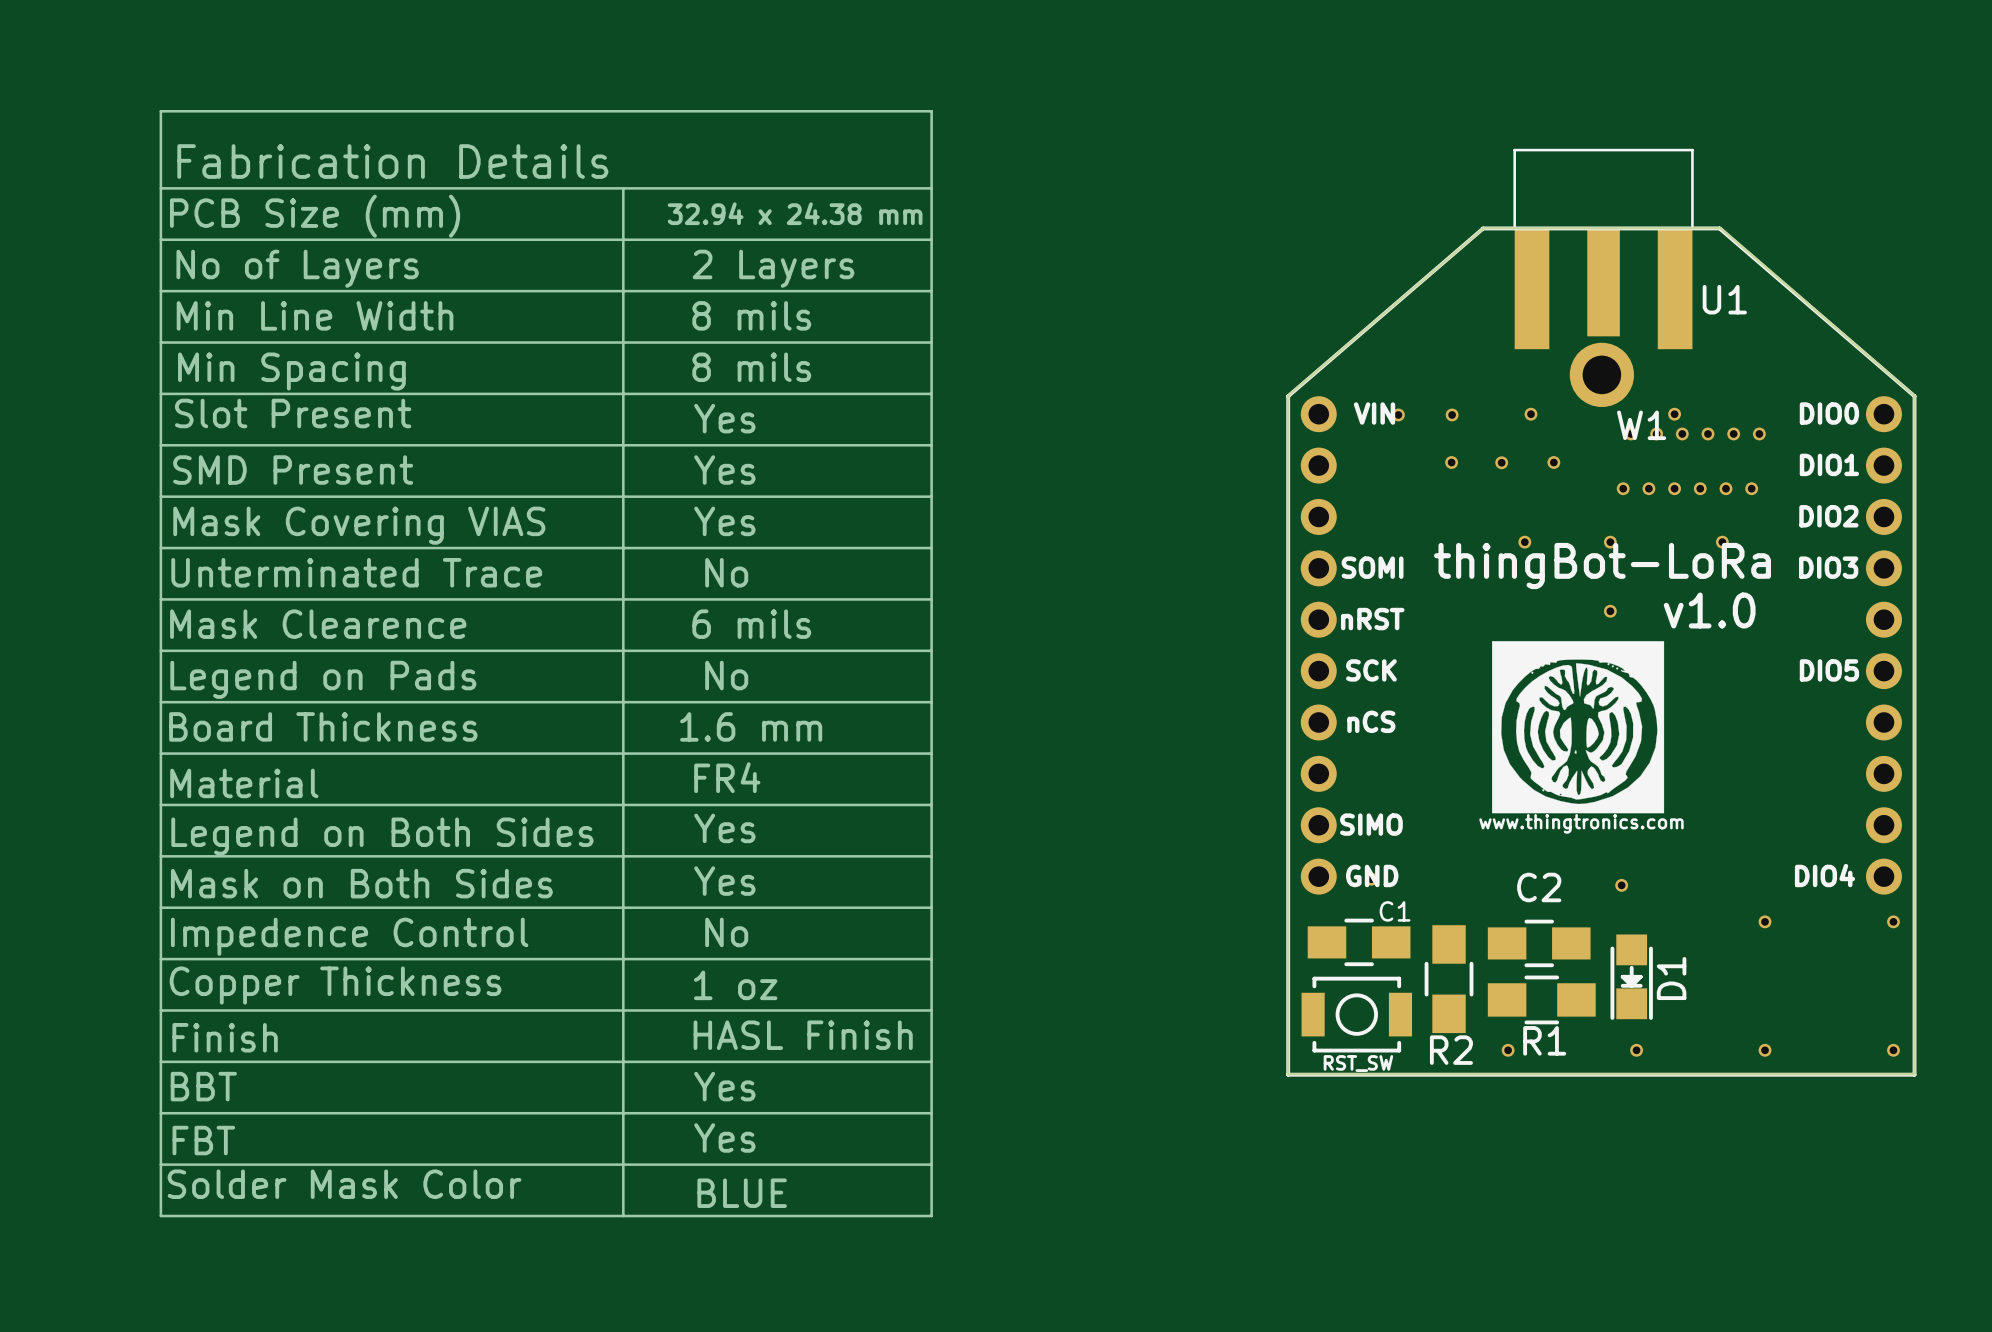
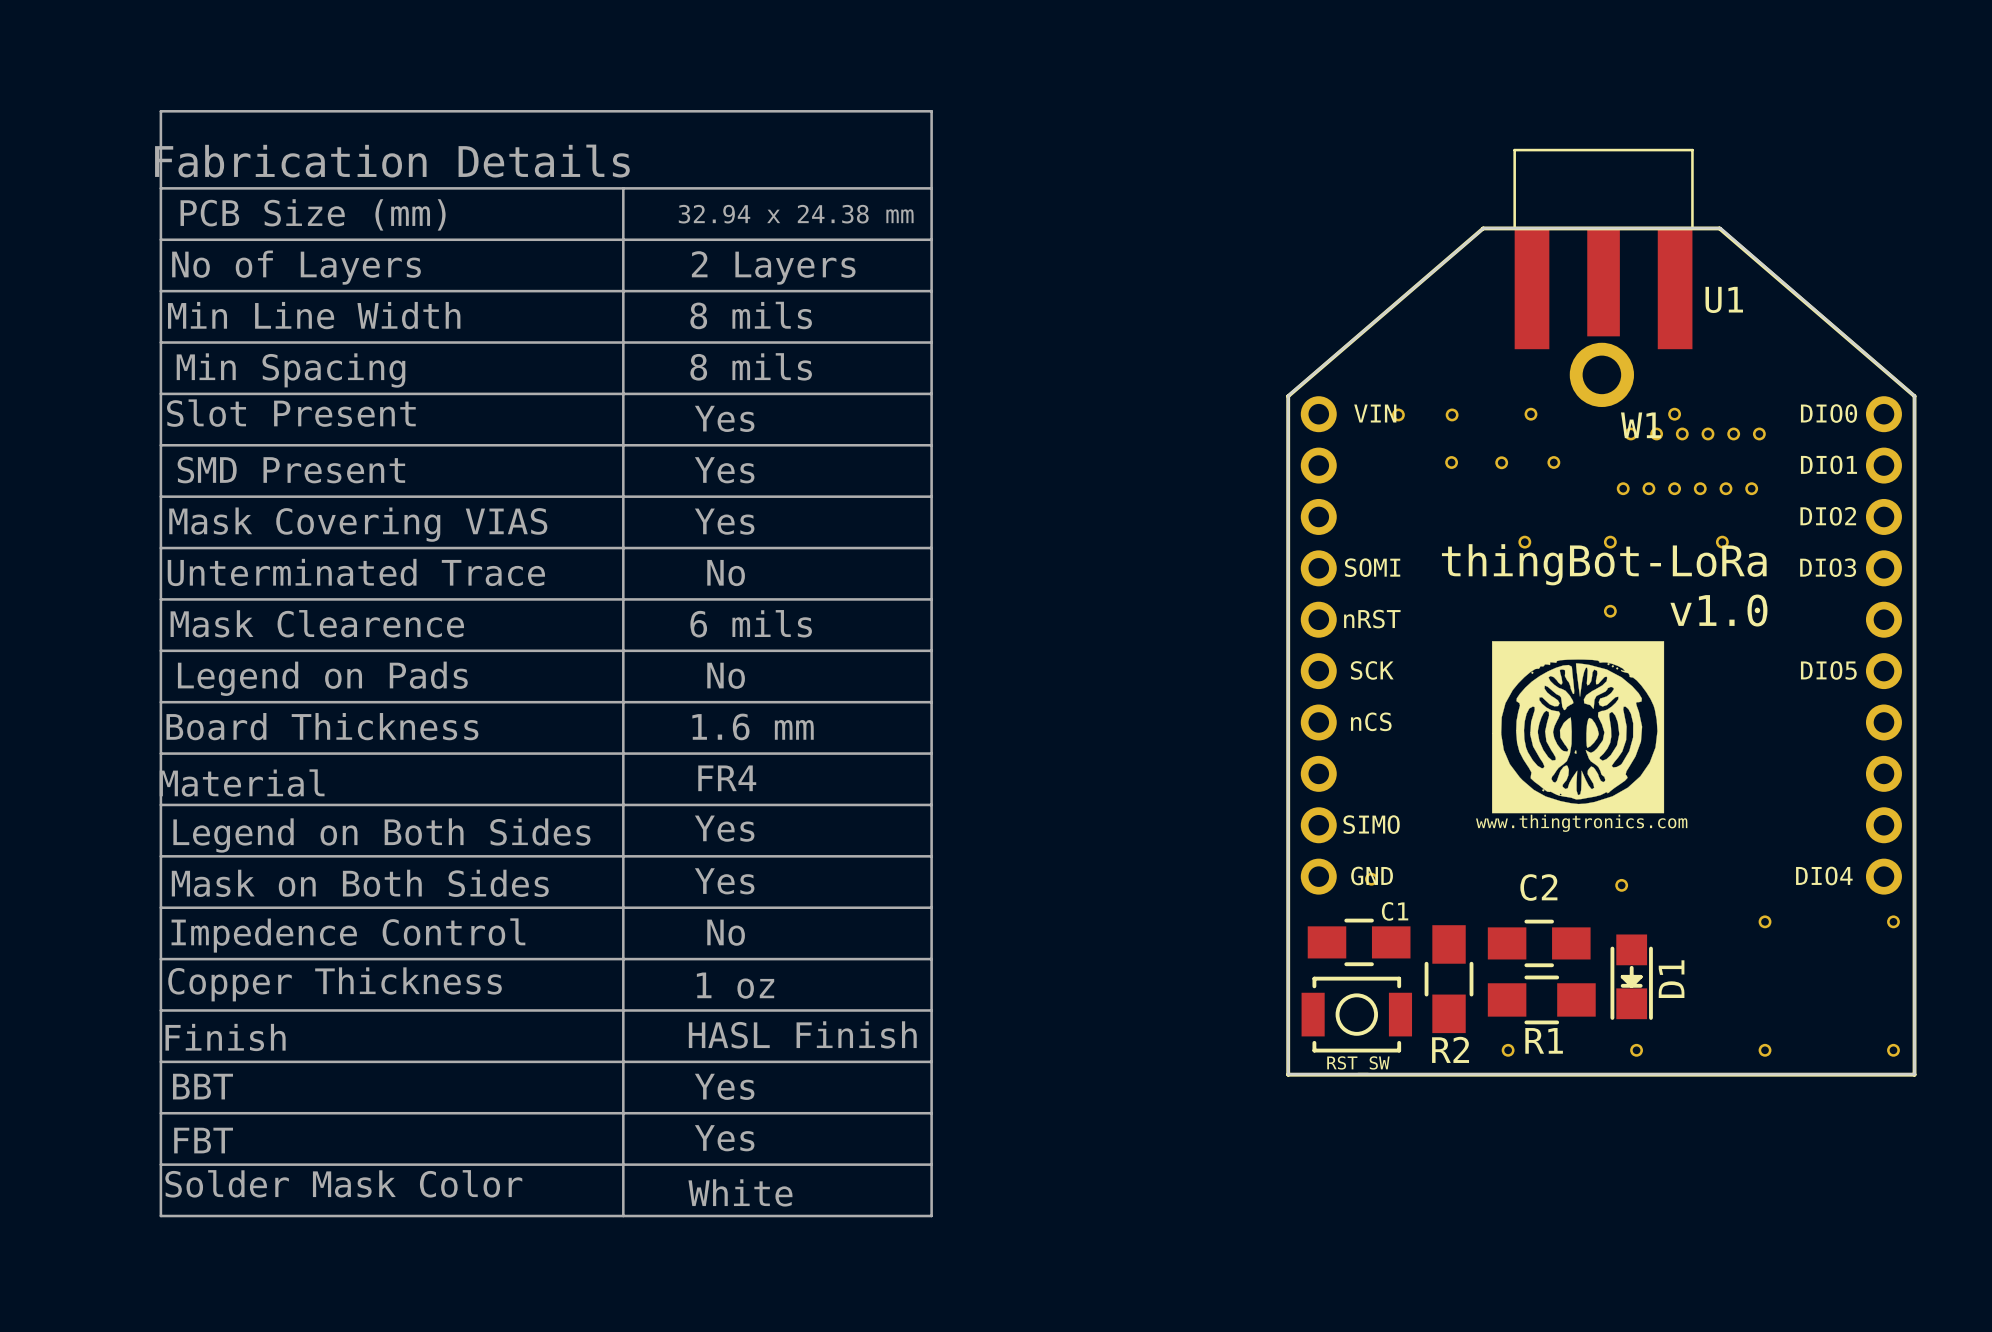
drawing shape: [159, 110, 933, 1218] -> [155, 110, 933, 1218]

